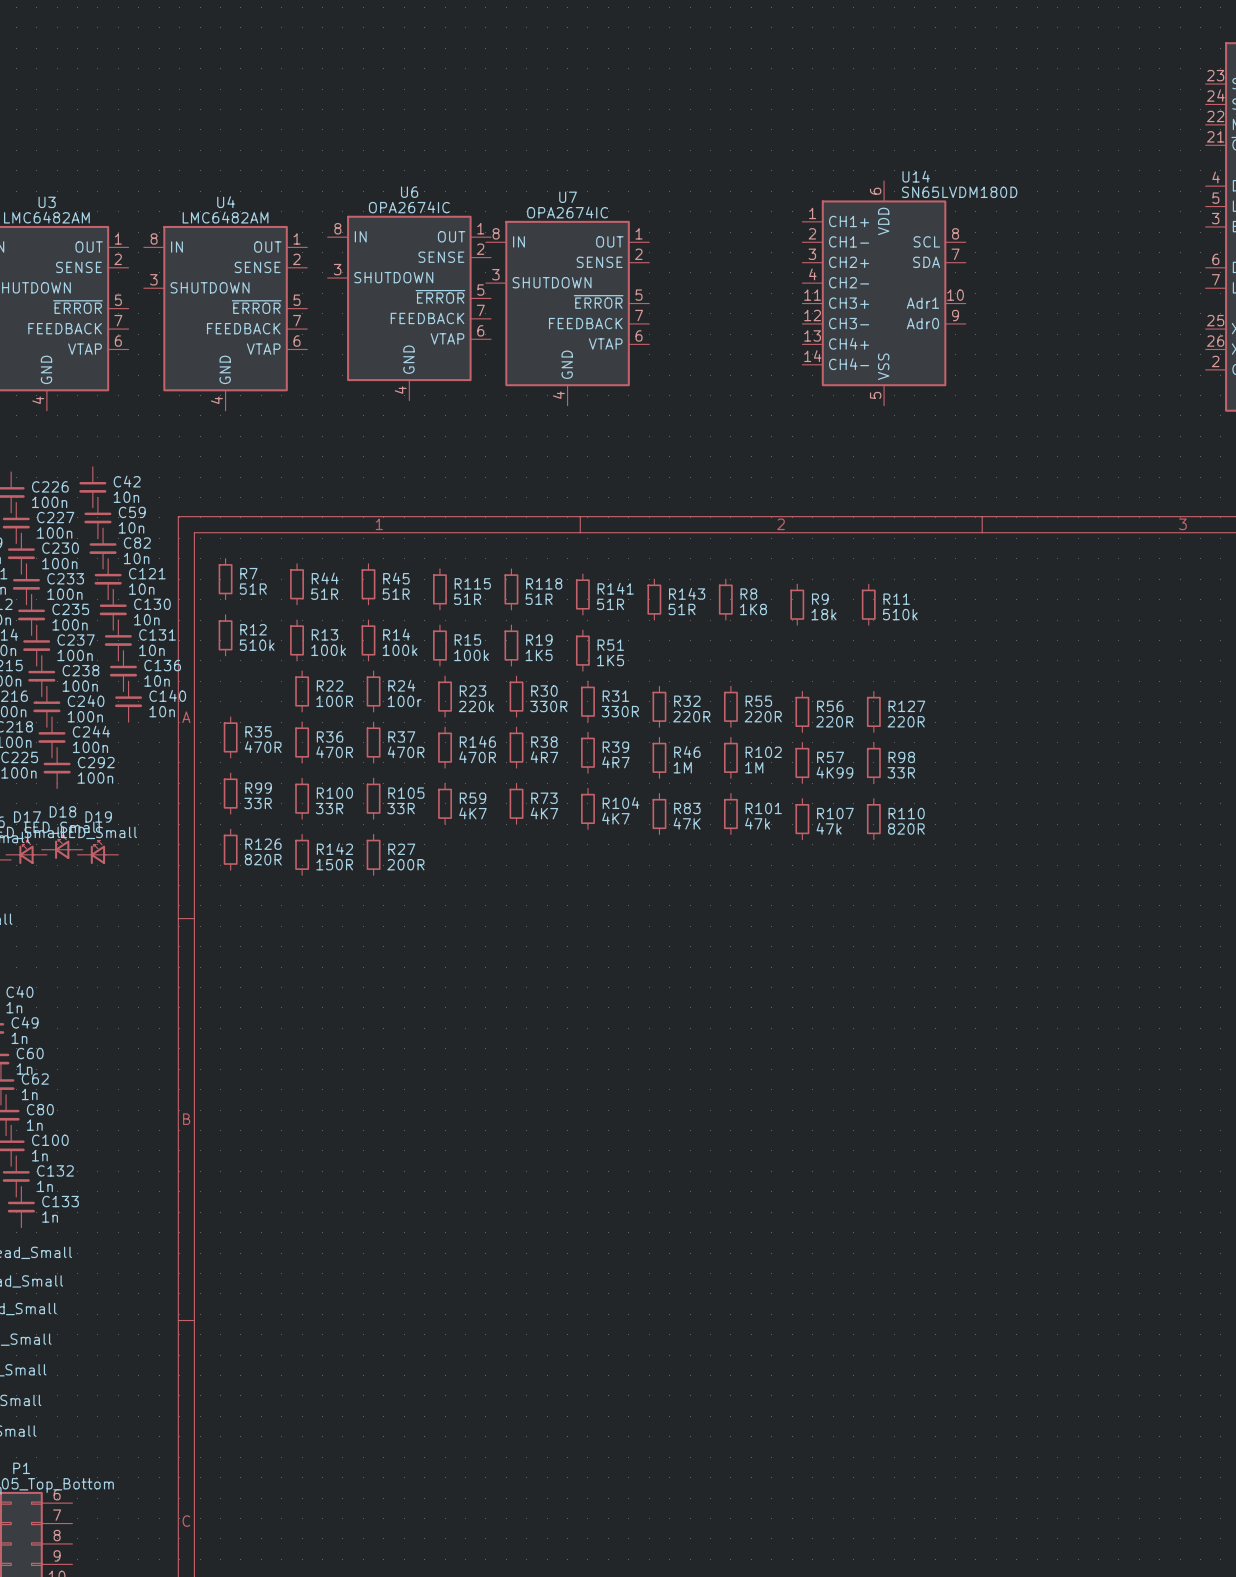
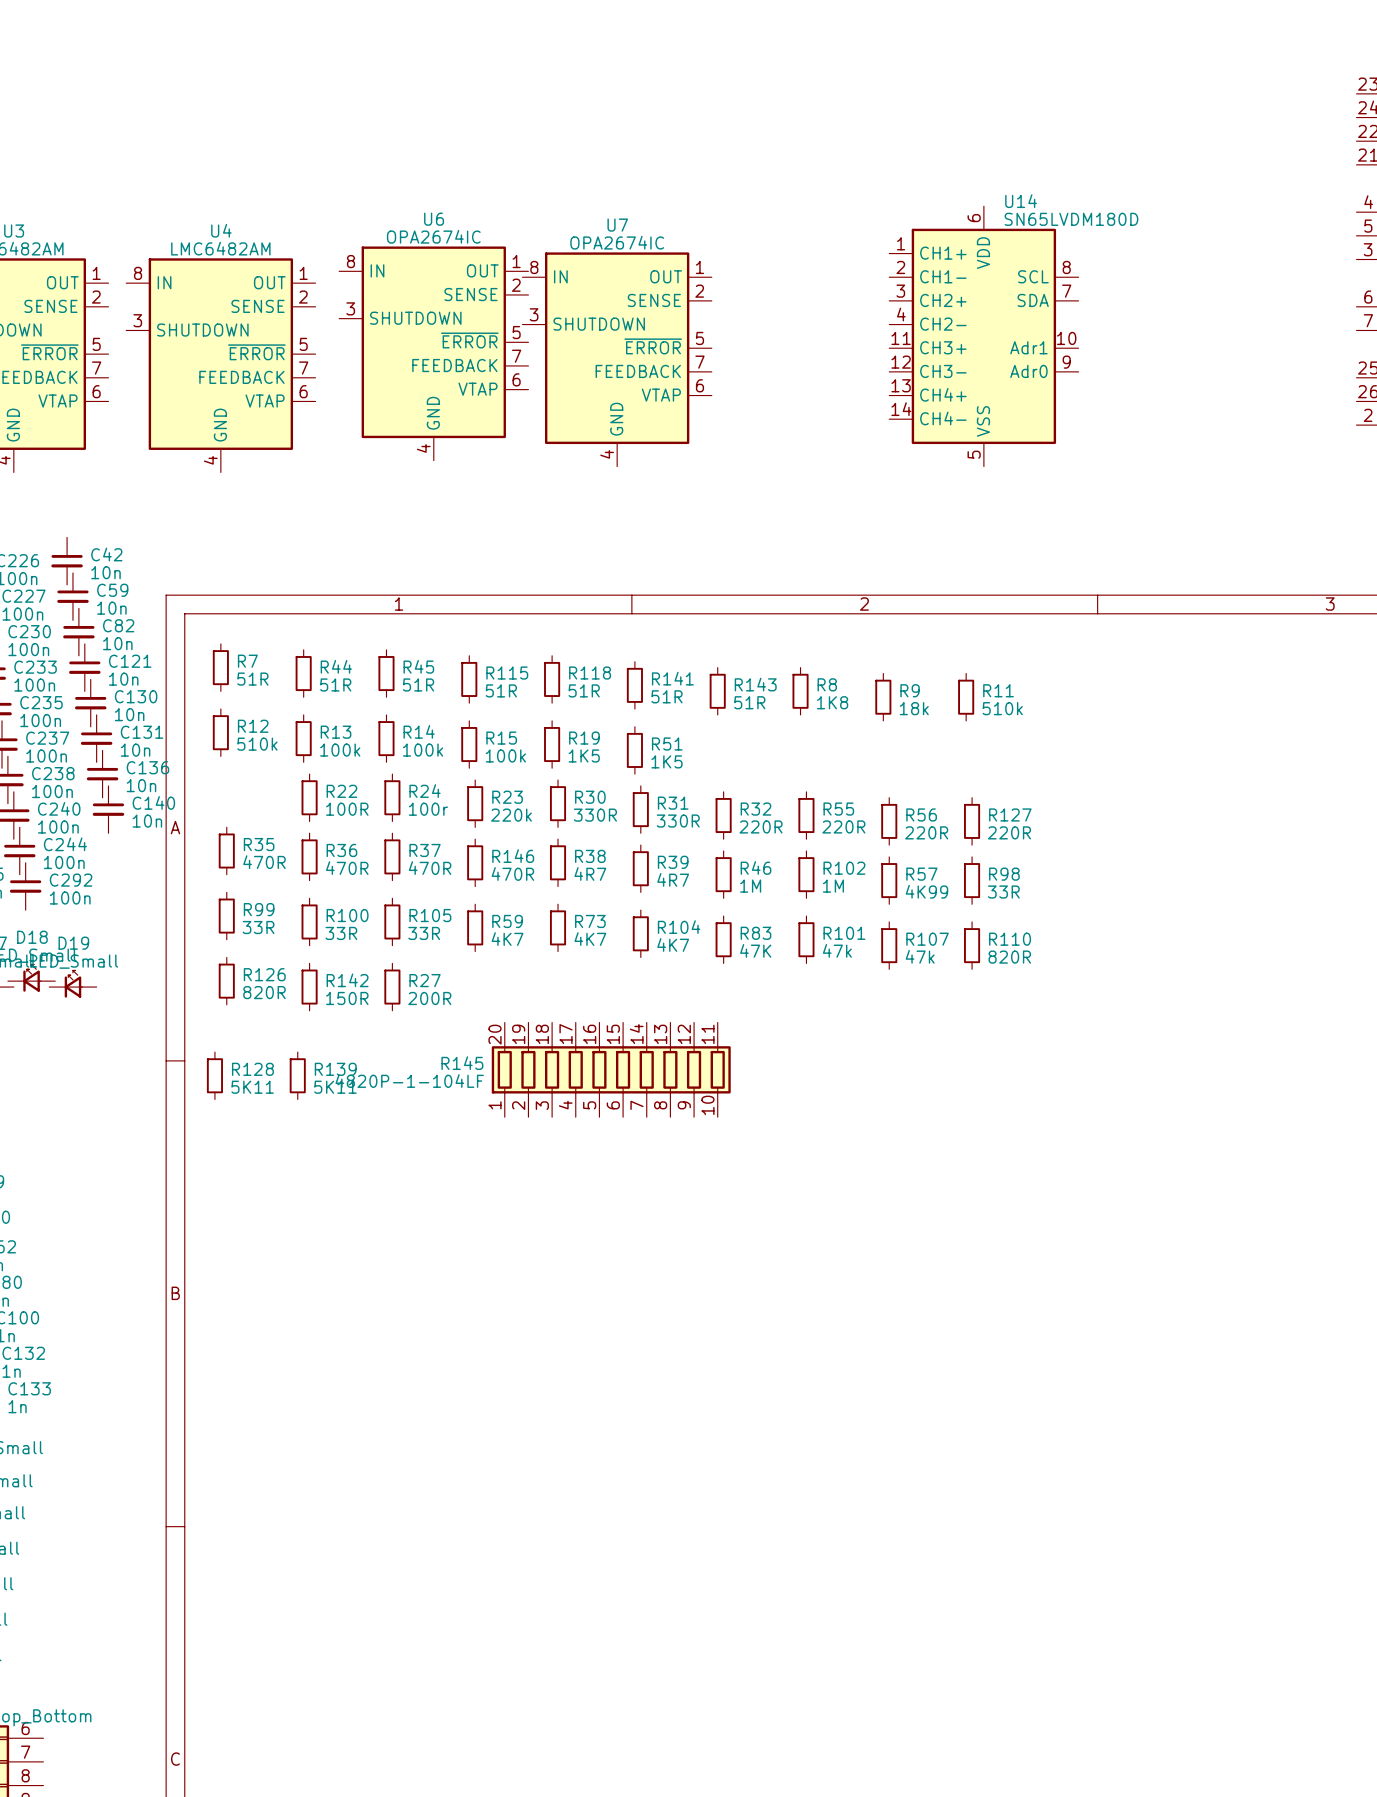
R145: none -> 4820P-1-104LF (611, 1069)
R128: none -> 5K11 (214, 1075)
R139: none -> 5K11 (297, 1075)

